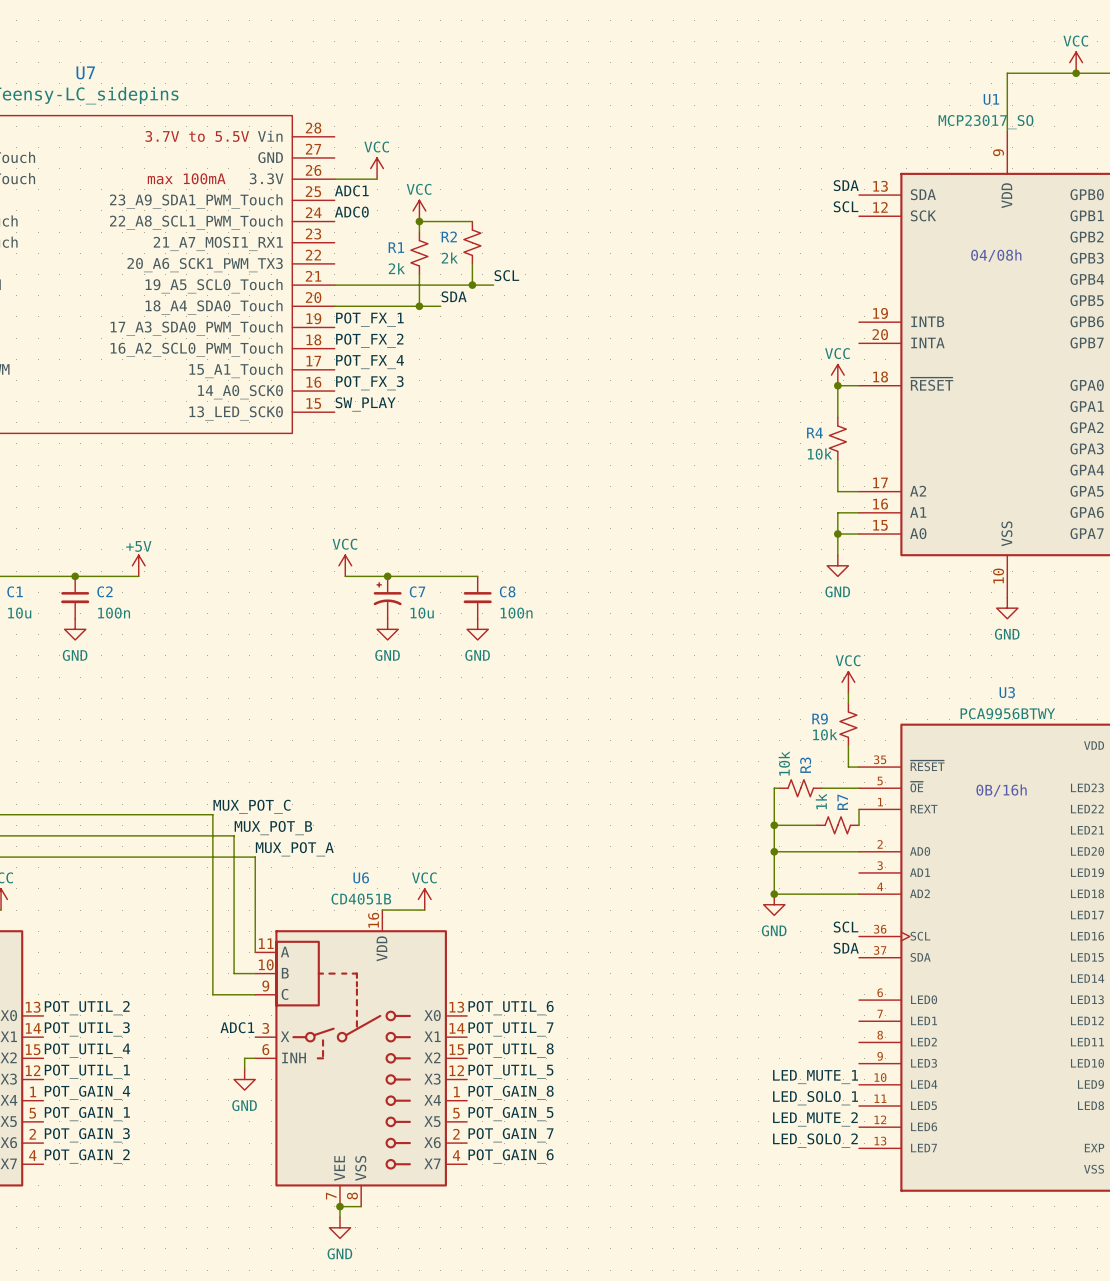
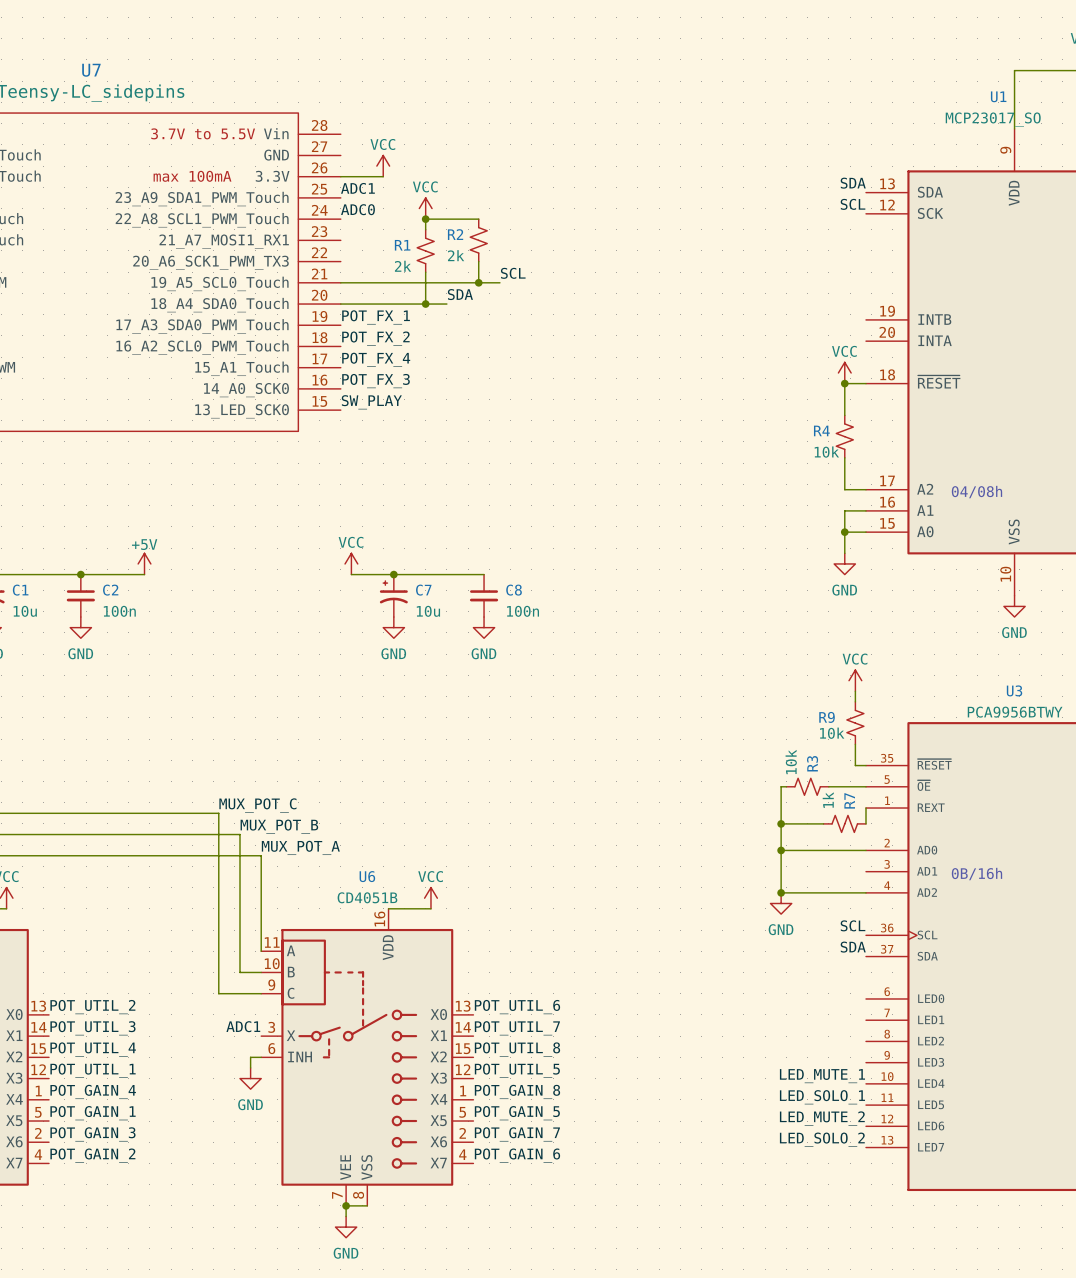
text: 04/08h (996, 255) -> none
text: none -> 04/08h (976, 492)
text position: 0B/16h (1001, 790) -> 0B/16h (976, 874)

